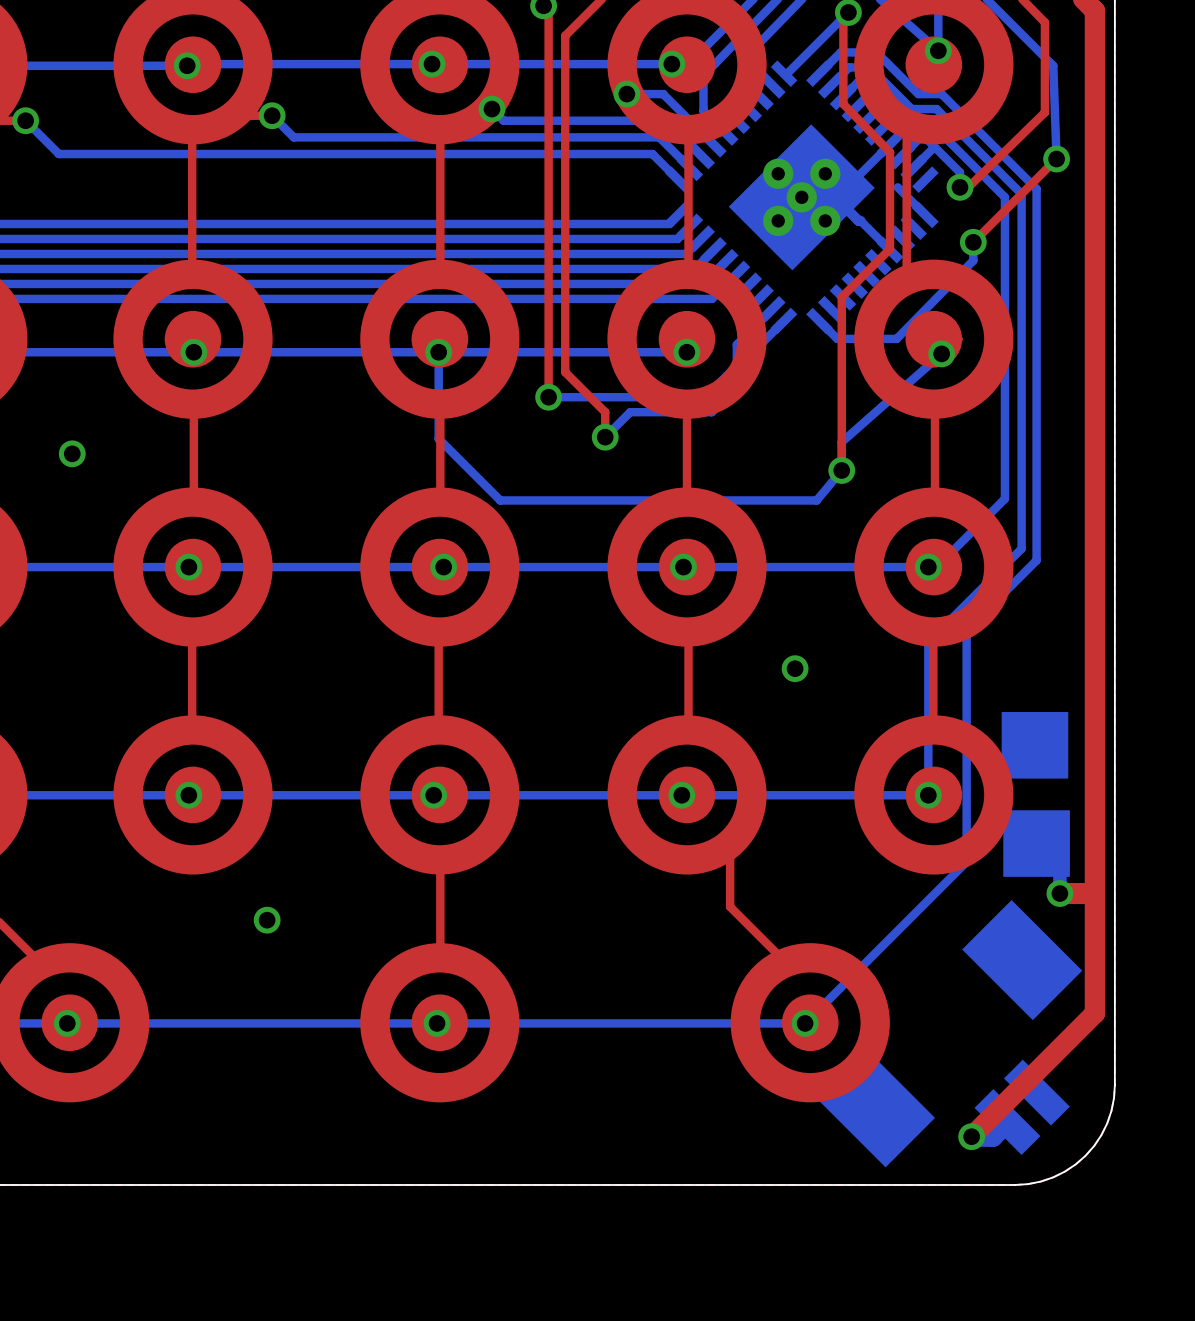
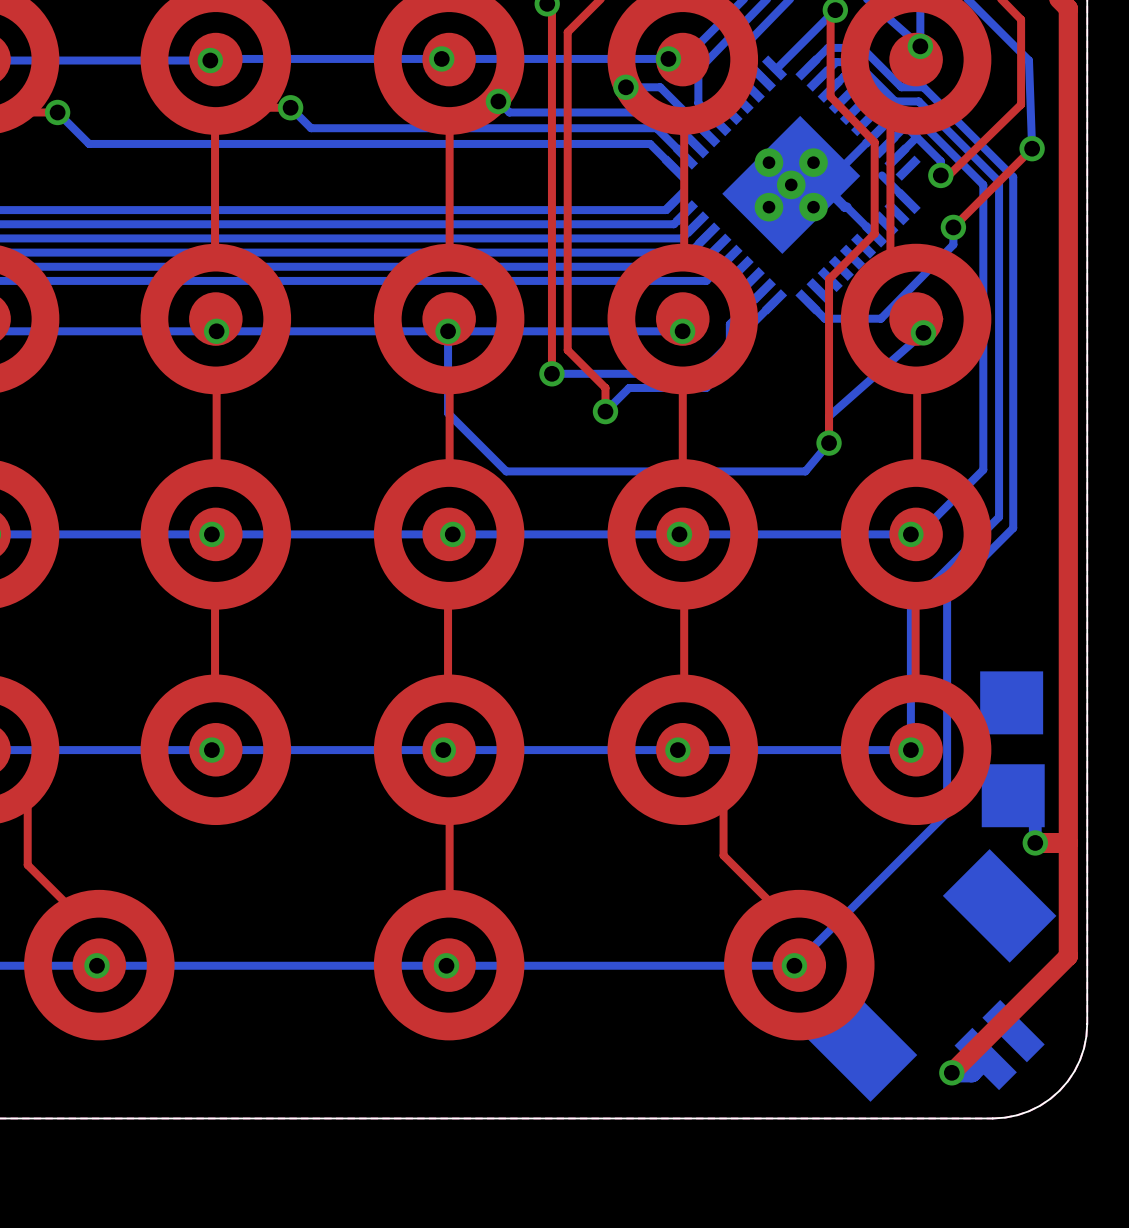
via: (72, 453) -> none
via: (795, 668) -> none
via: (267, 920) -> none

